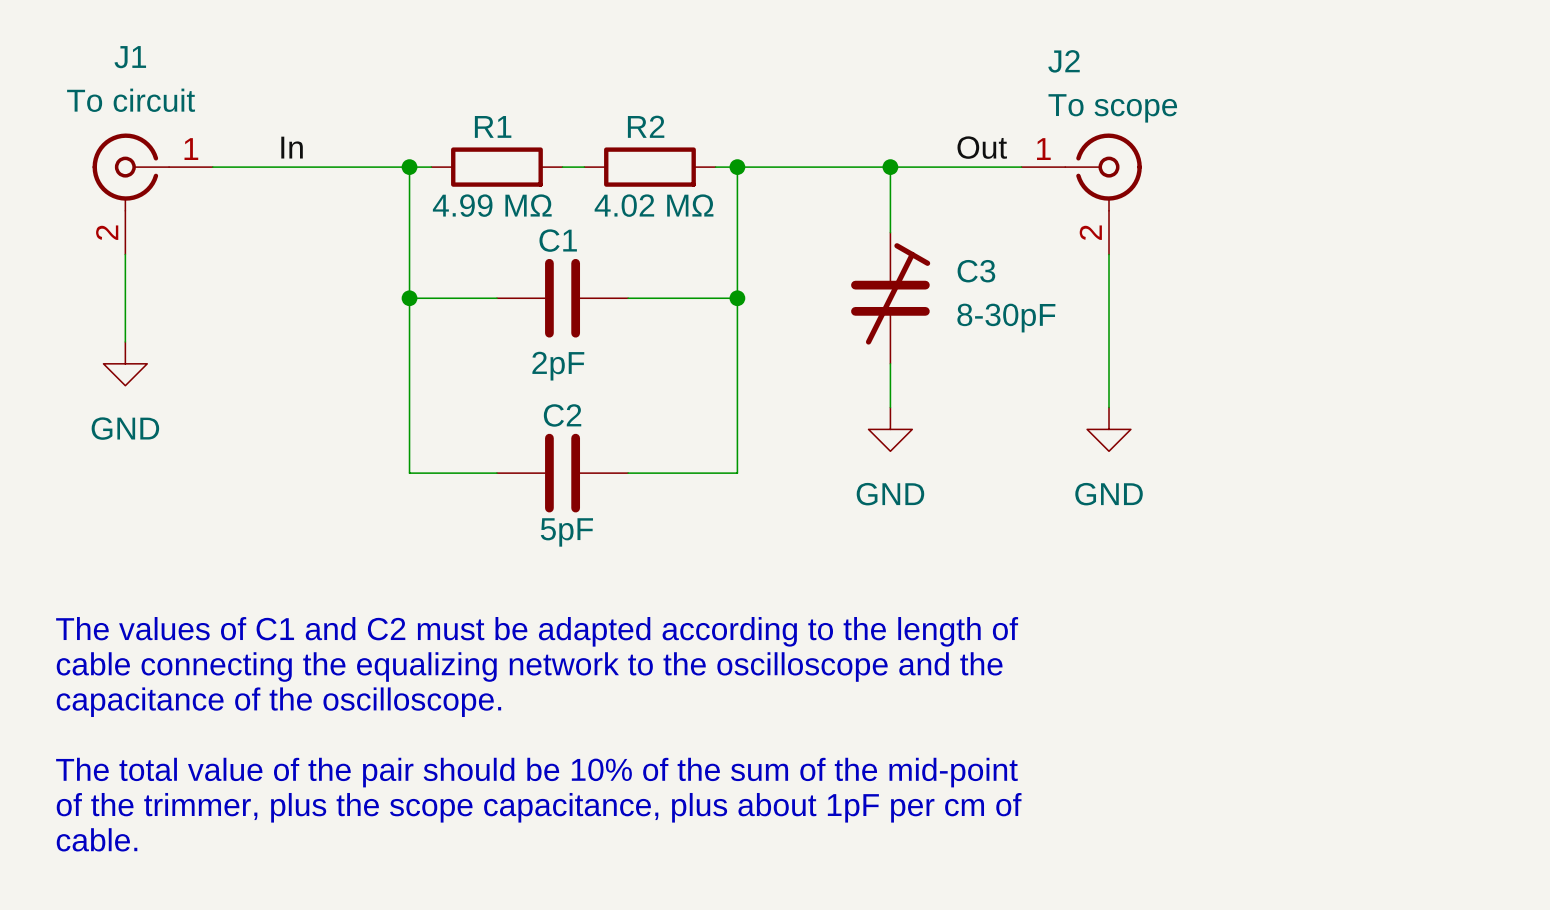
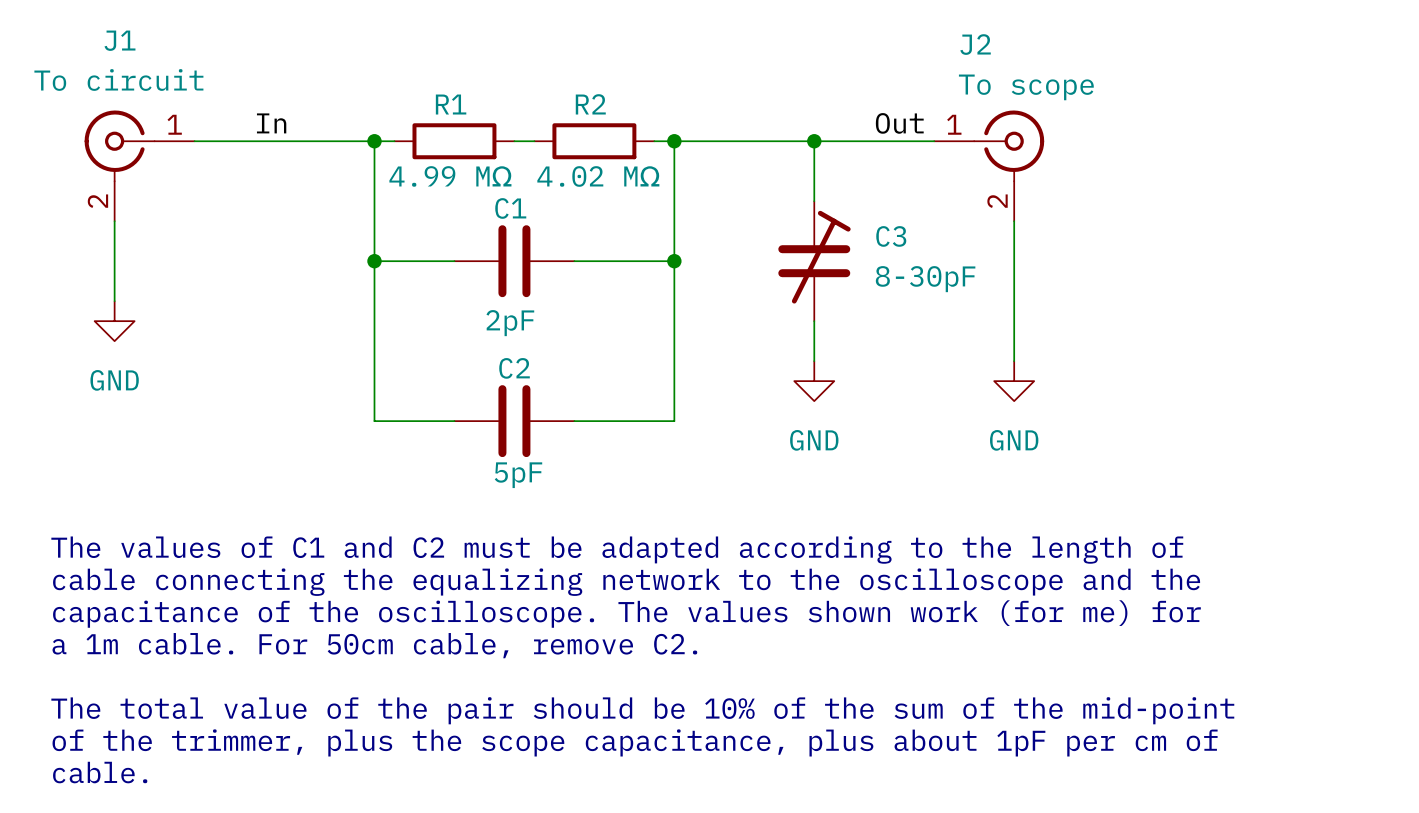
text position: The values of C1 and C2 must be adapted according to the length of (537, 631) -> The values of C1 and C2 must be adapted according to the length of (617, 549)
text position: cable connecting the equalizing network to the oscilloscope and the (529, 667) -> cable connecting the equalizing network to the oscilloscope and the (626, 582)
text: capacitance of the oscilloscope. (278, 702) -> capacitance of the oscilloscope. The values shown work (for me) for (626, 614)
text: none -> a 1m cable. For 50cm cable, remove C2. (374, 645)
text position: The total value of the pair should be 10% of the sum of the mid-point (536, 772) -> The total value of the pair should be 10% of the sum of the mid-point (642, 710)
text position: of the trimmer, plus the scope capacitance, plus about 1pF per cm of (539, 807) -> of the trimmer, plus the scope capacitance, plus about 1pF per cm of (635, 742)
text position: cable. (97, 839) -> cable. (100, 772)

